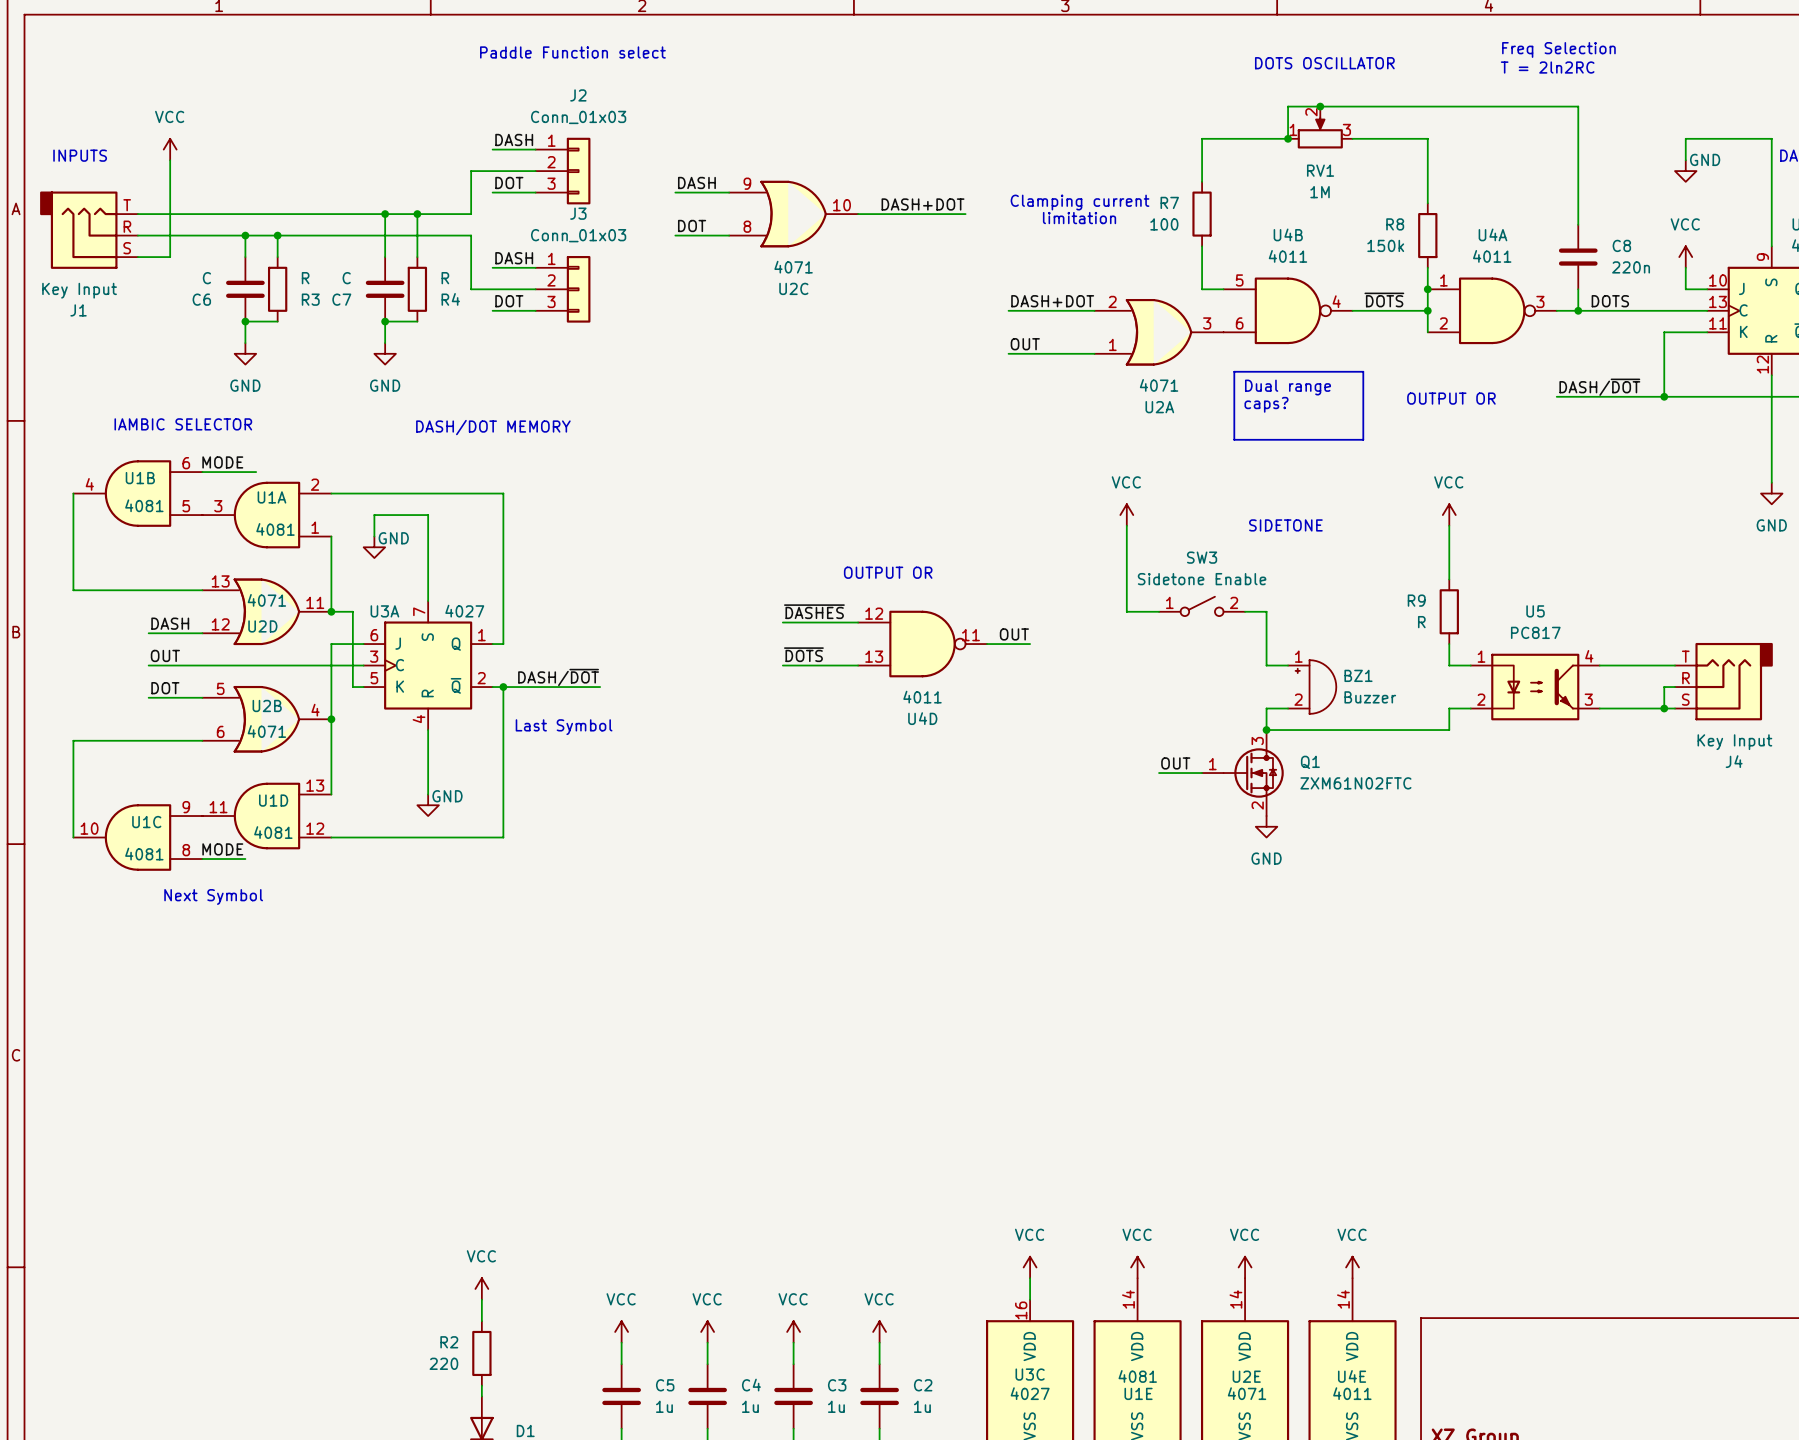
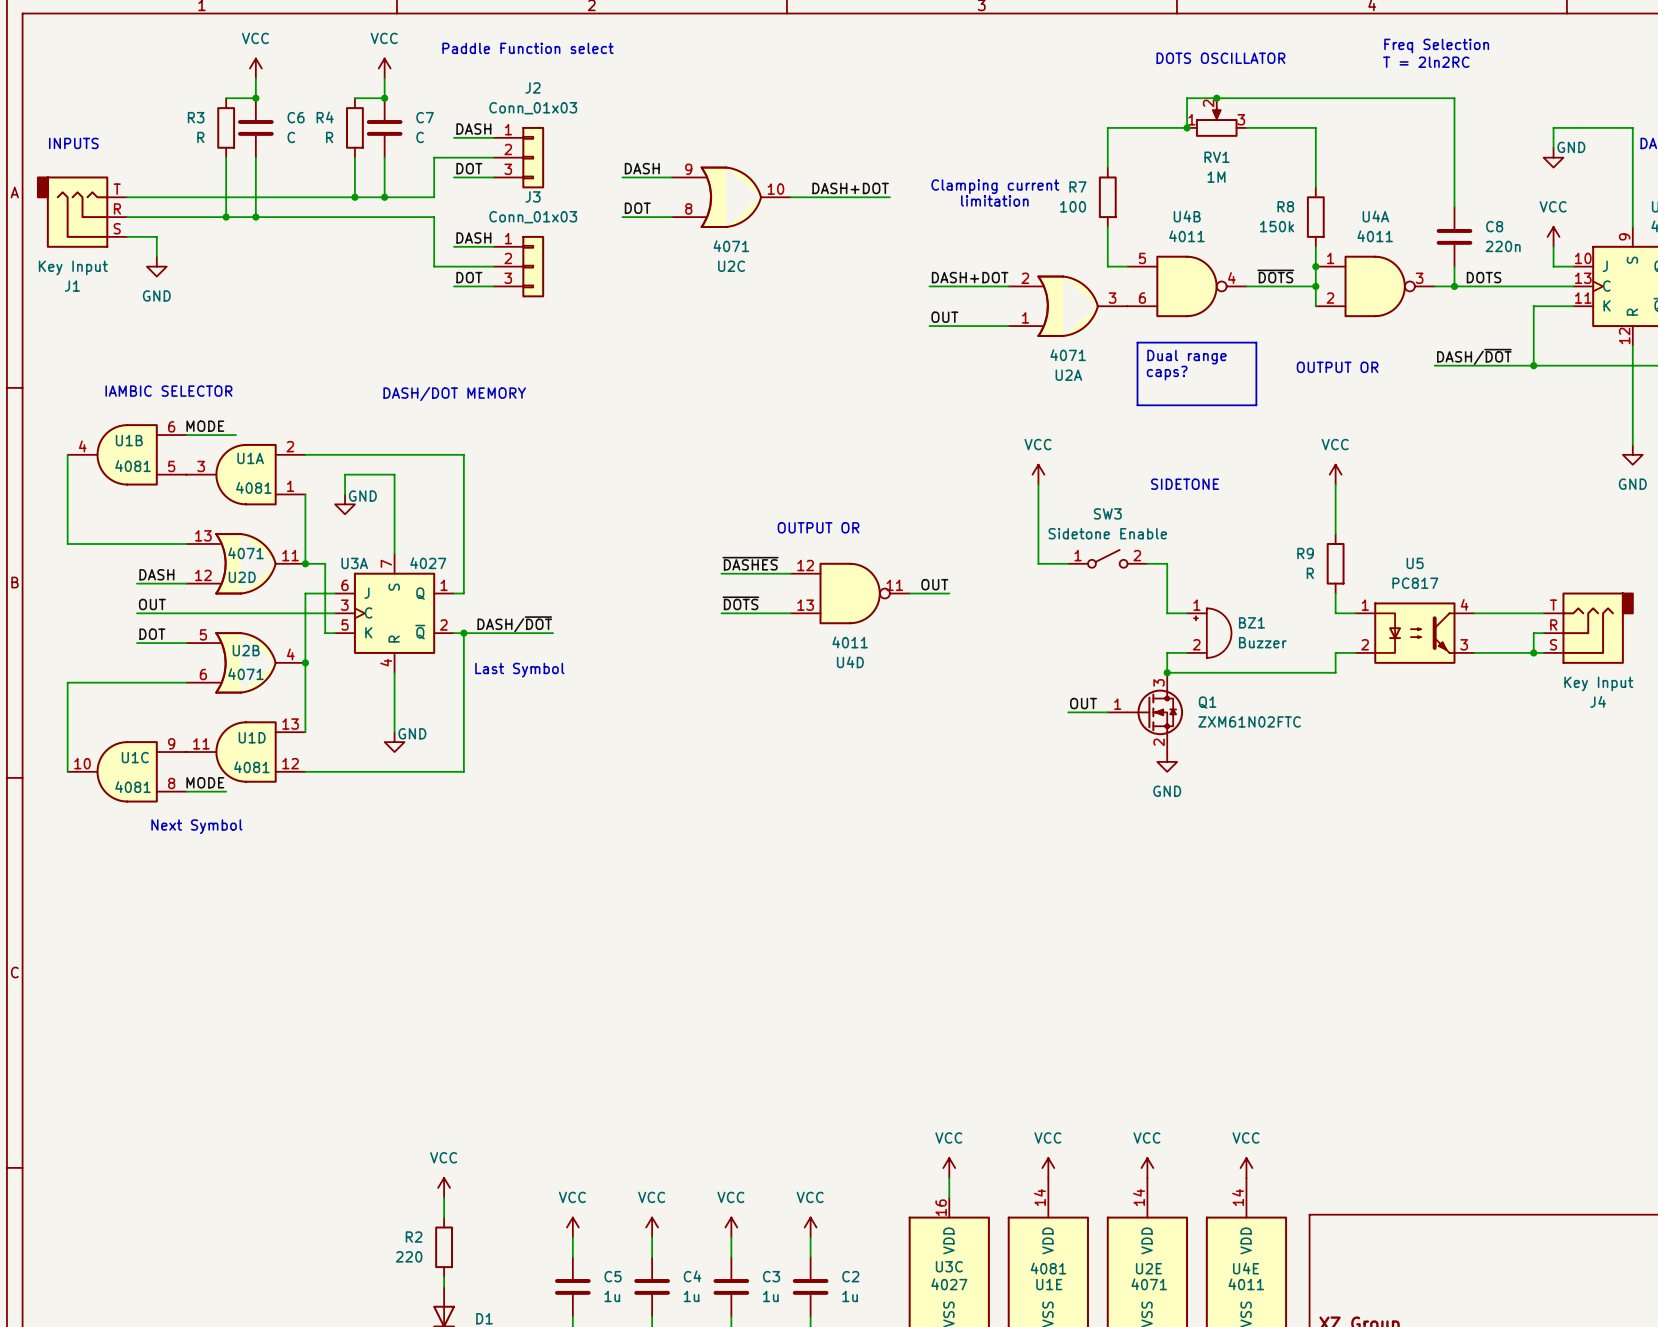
power symbol: none -> VCC (255, 68)
power symbol: none -> VCC (384, 68)
wire: none -> (255, 78) (255, 98) (226, 98)
wire: none -> (384, 78) (384, 98) (354, 98)
junction: none -> (255, 98)
junction: none -> (384, 98)
power symbol: VCC (170, 149) -> none
wire: (170, 160) (170, 257) -> (156, 256) (156, 236)
wire: (385, 214) (385, 257) -> (354, 197) (354, 157)
wire: (417, 214) (417, 257) -> (384, 197) (384, 157)
wire: (245, 235) (245, 257) -> (226, 217) (226, 157)
wire: (277, 235) (277, 257) -> (255, 217) (255, 157)
C6 value position: C (206, 278) -> C (291, 137)
R3 value position: R (305, 278) -> R (200, 137)
C7 value position: C (346, 278) -> C (420, 137)
R4 value position: R (445, 278) -> R (329, 137)
C6 position: (245, 289) -> (255, 127)
R3 position: (277, 289) -> (226, 127)
C7 position: (385, 289) -> (384, 127)
R4 position: (417, 289) -> (354, 127)
C6 name position: C6 (201, 299) -> C6 (296, 117)
R3 name position: R3 (310, 299) -> R3 (196, 117)
C7 name position: C7 (341, 299) -> C7 (425, 117)
R4 name position: R4 (450, 299) -> R4 (325, 117)
junction: (245, 321) -> none
wire: (277, 321) (245, 321) (245, 343) -> none
junction: (385, 321) -> none
wire: (417, 321) (385, 321) (385, 343) -> none
power symbol position: GND (245, 353) -> GND (156, 266)
power symbol: GND (385, 353) -> none

